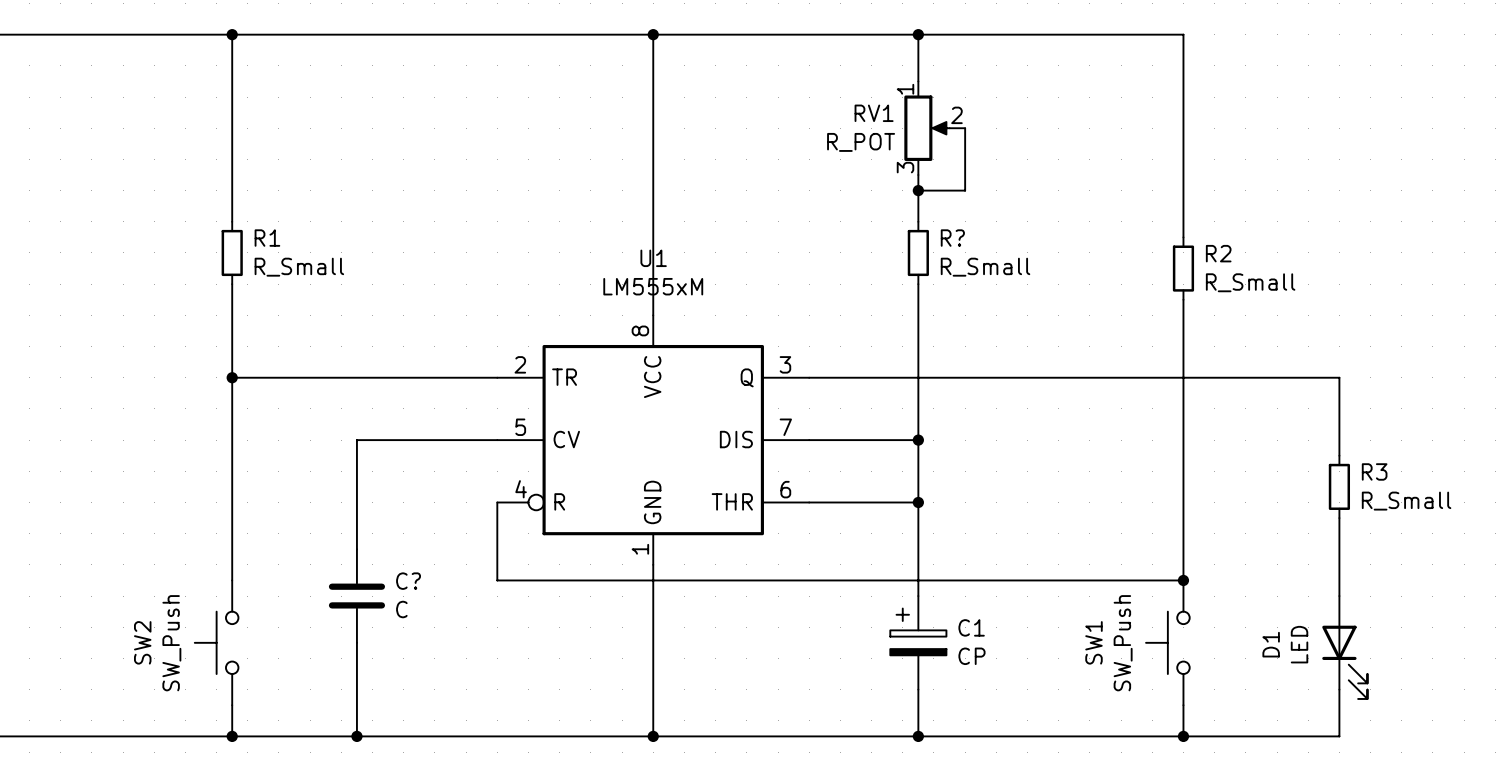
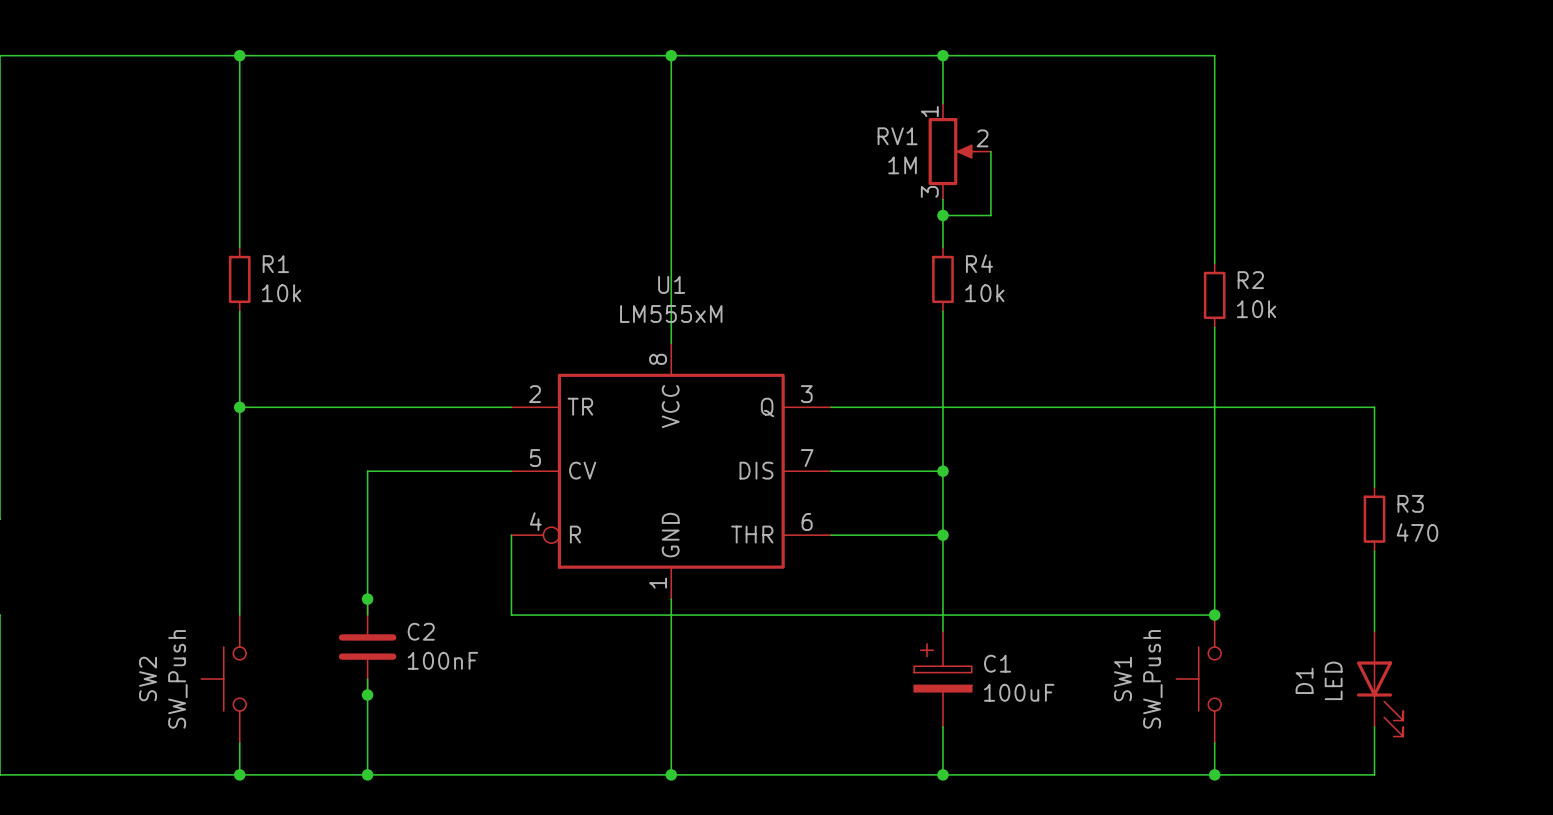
RV1 value: R_POT (861, 142) -> 1M (902, 165)
R? name: R? (952, 238) -> R4 (979, 263)
R1 value: R_Small (299, 267) -> 10k (281, 293)
R? value: R_Small (985, 267) -> 10k (984, 293)
R2 value: R_Small (1250, 282) -> 10k (1256, 309)
R3 value: R_Small (1406, 501) -> 470 (1417, 532)
junction: none -> (367, 599)
C?: C (356, 596) -> none
C2: none -> 100nF (367, 647)
C1 value: CP (971, 656) -> 100uF (1019, 692)
junction: none -> (367, 694)

